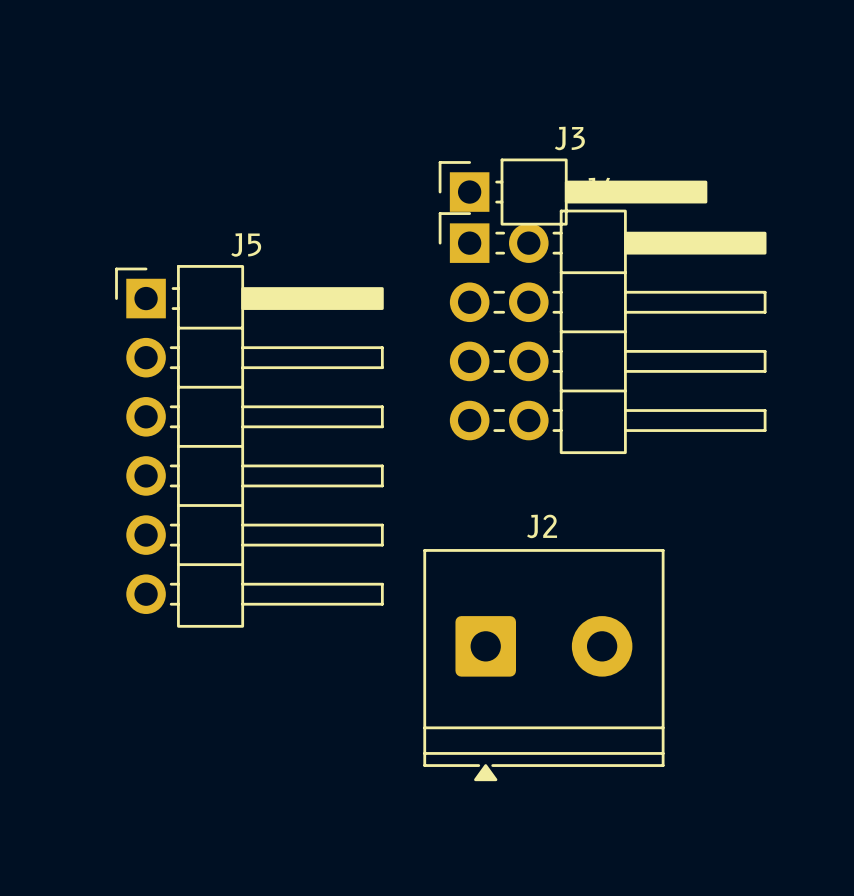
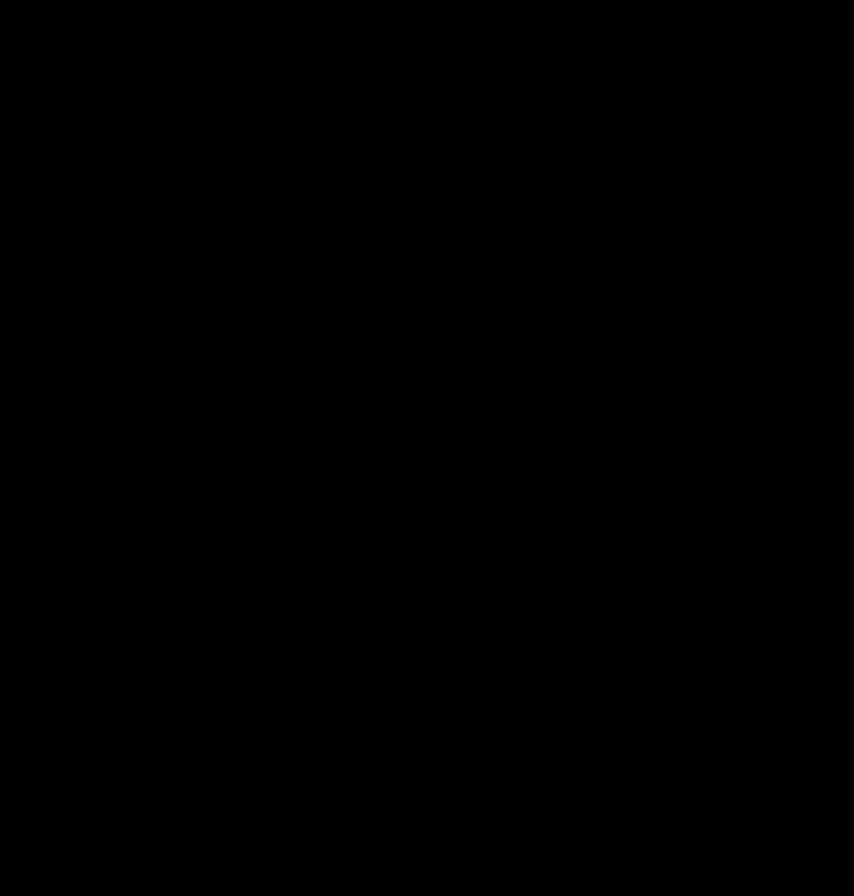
J3: (573, 192) -> none
part: (602, 331) -> none
J5: (249, 446) -> none
J2: (543, 665) -> none

